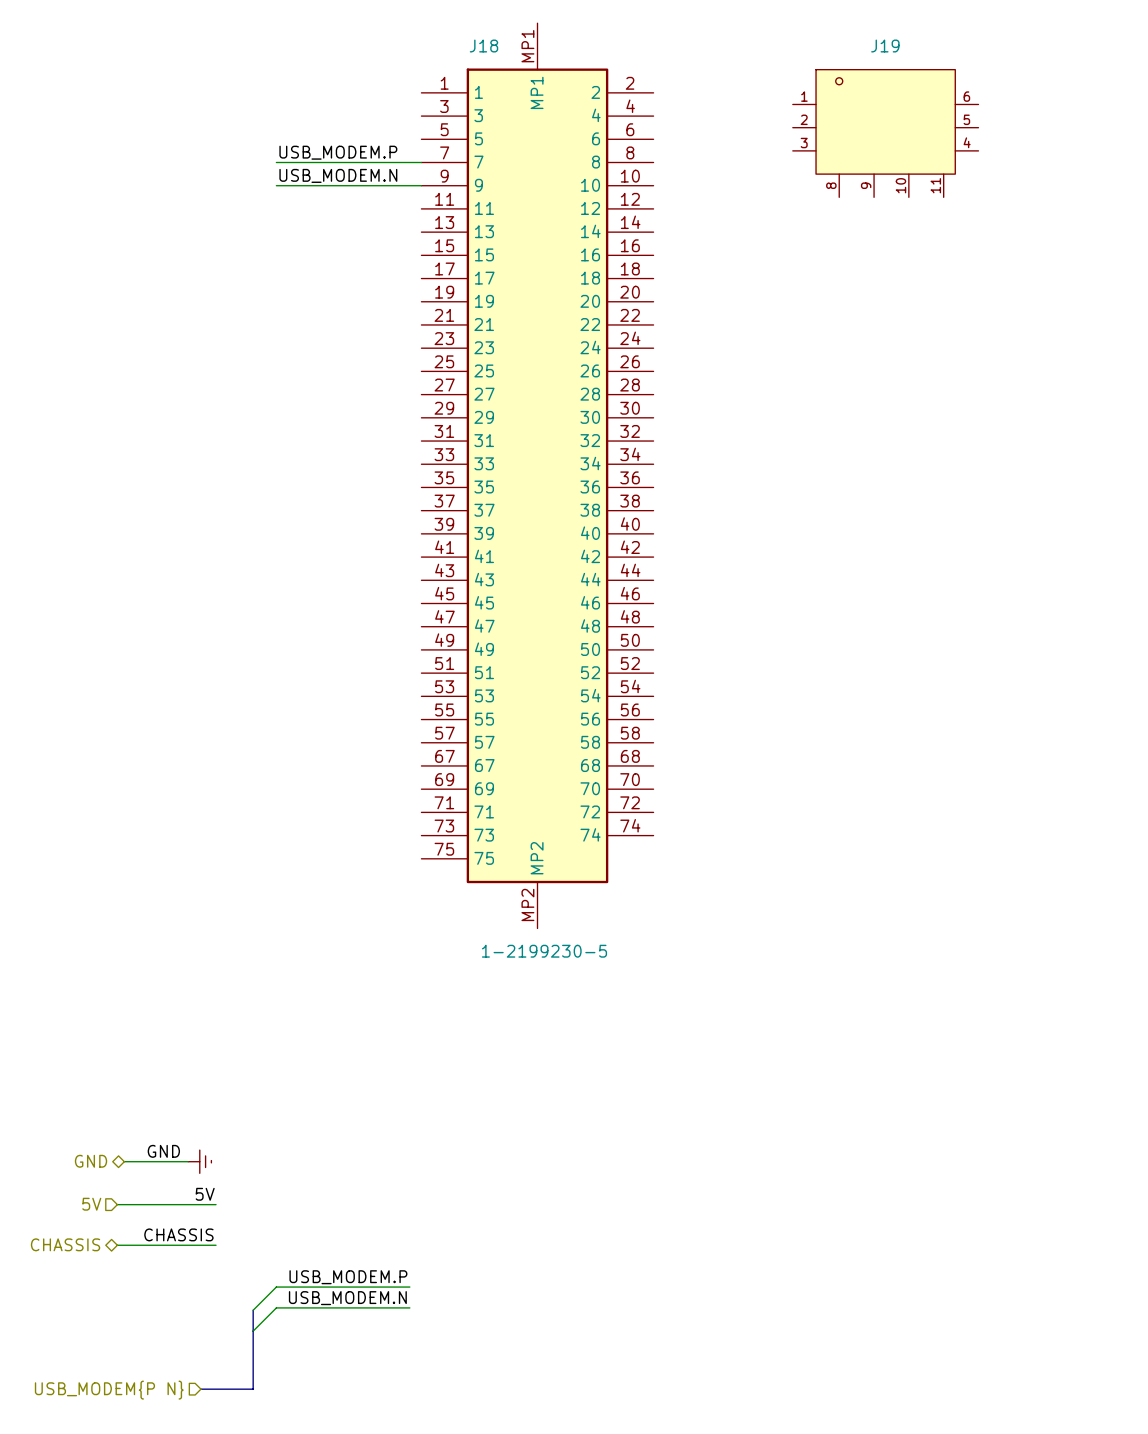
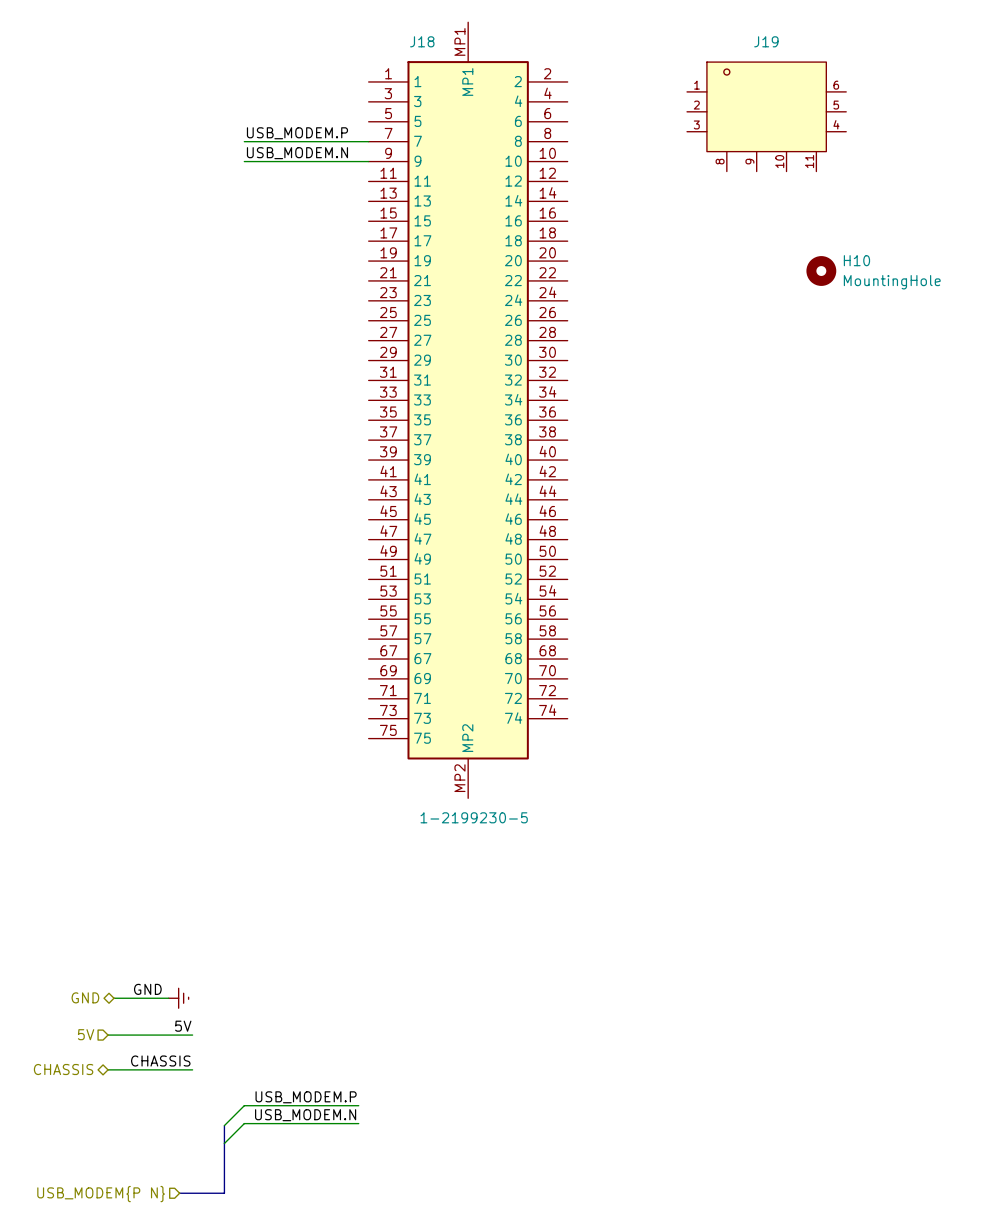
H10: none -> MountingHole (821, 271)

